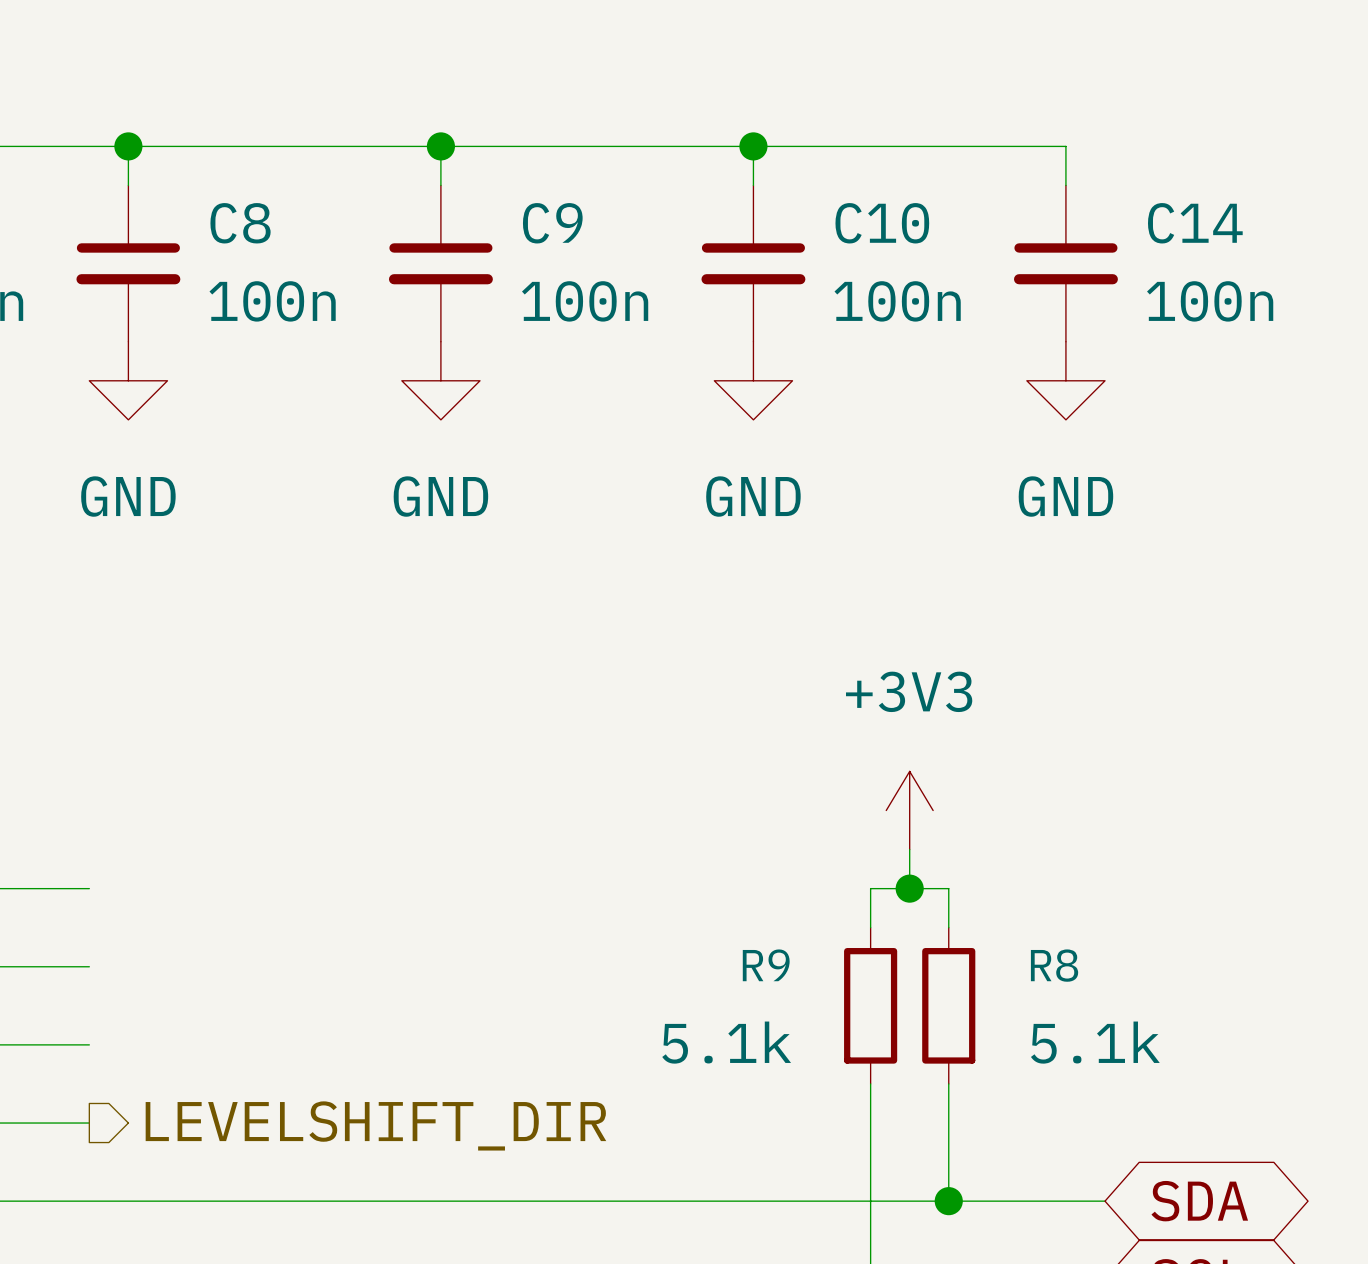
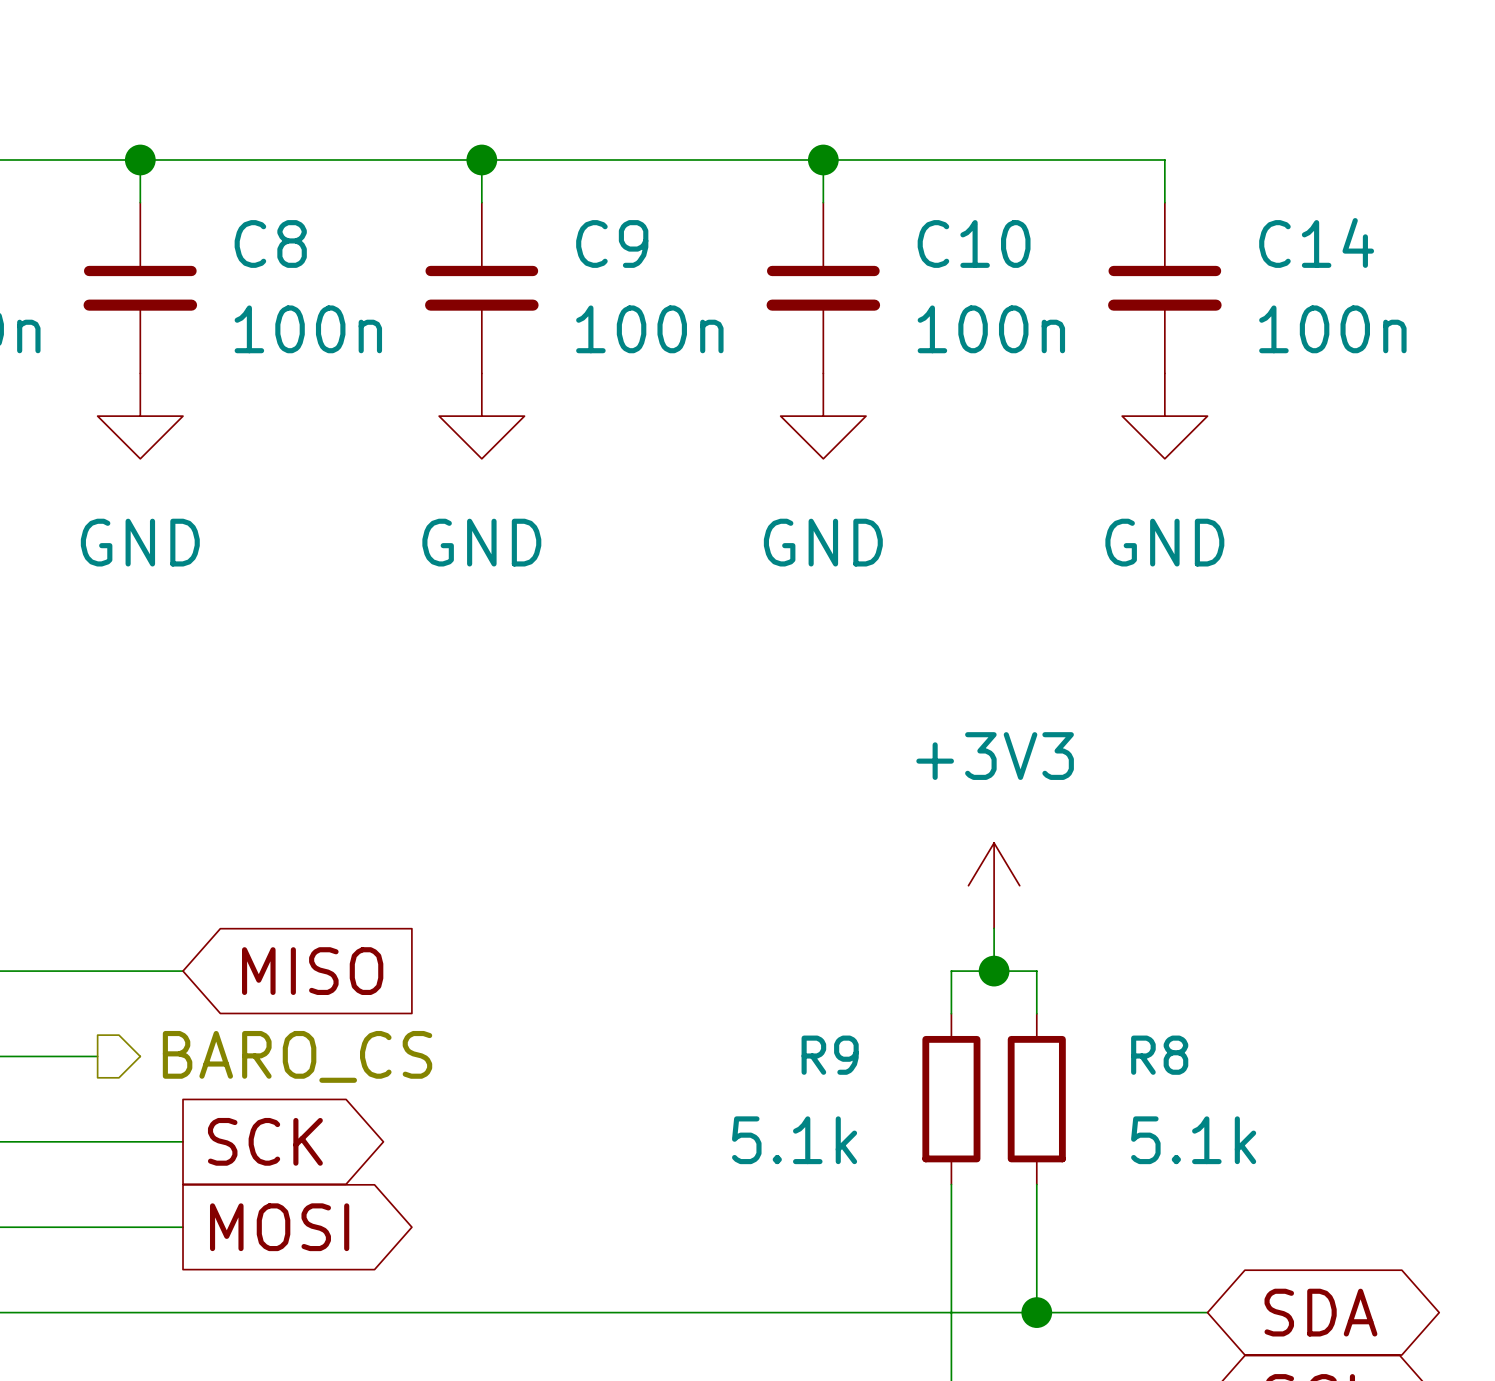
wire: none -> (97, 971) (183, 971)
global label: none -> MISO (312, 971)
hierarchical label: none -> BARO_CS (297, 1056)
wire: none -> (97, 1141) (183, 1141)
global label: none -> SCK (265, 1141)
wire: none -> (97, 1227) (183, 1227)
global label: none -> MOSI (279, 1227)
hierarchical label: LEVELSHIFT_DIR (375, 1125) -> none

